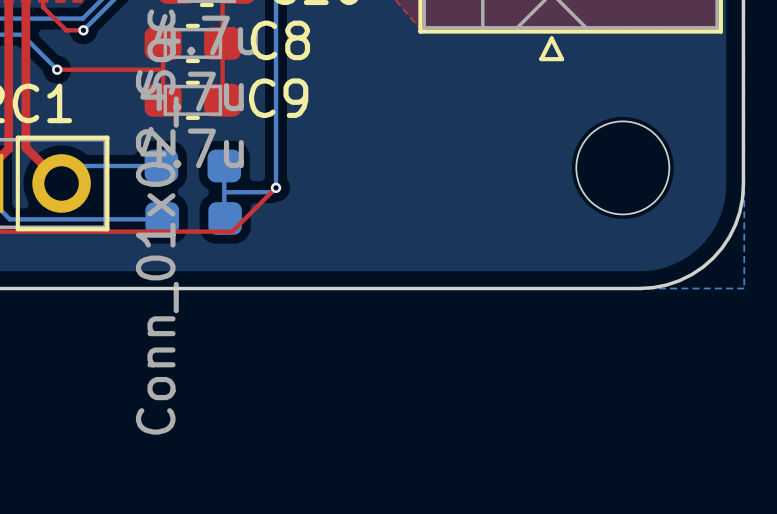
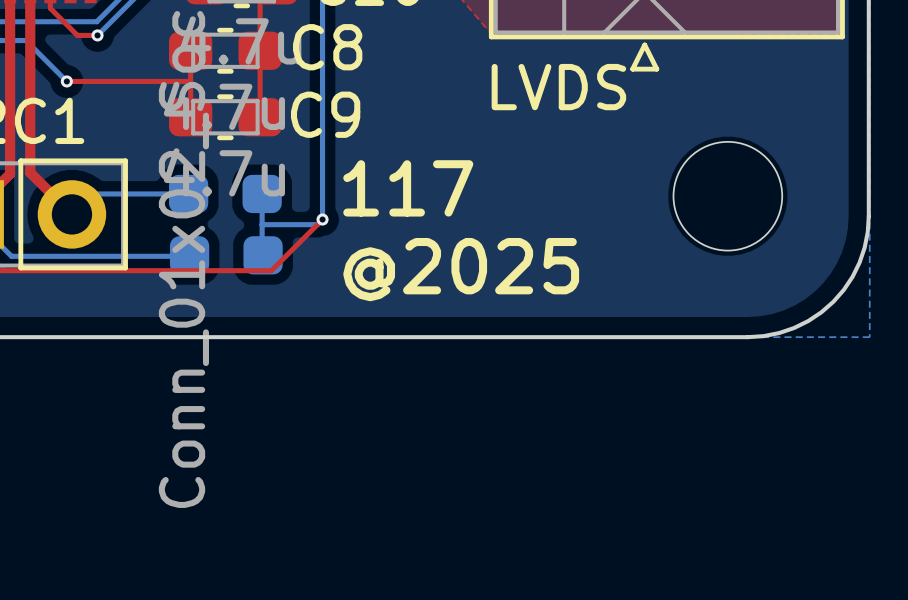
text: none -> LVDS (558, 87)
text: none -> 117 (408, 188)
text: none -> @2025 (461, 269)

